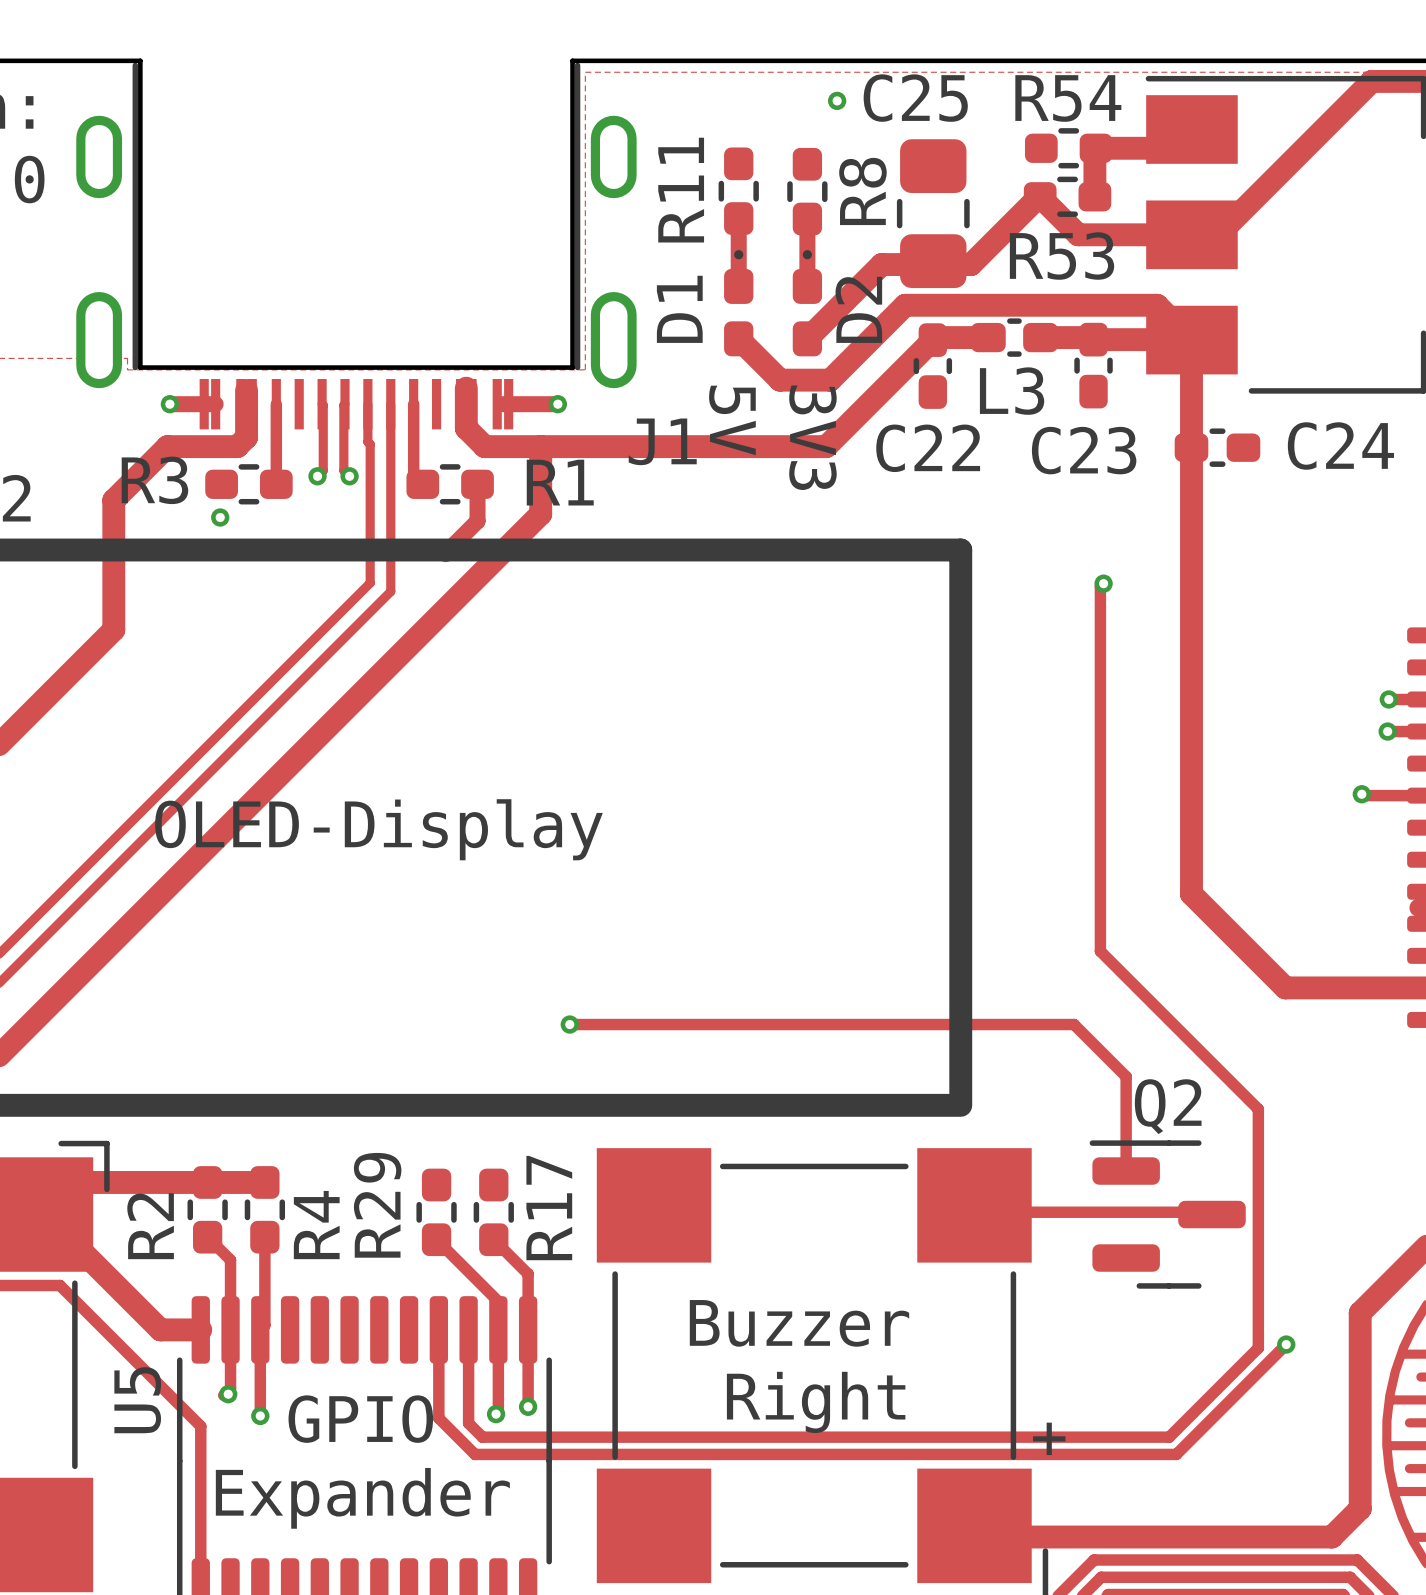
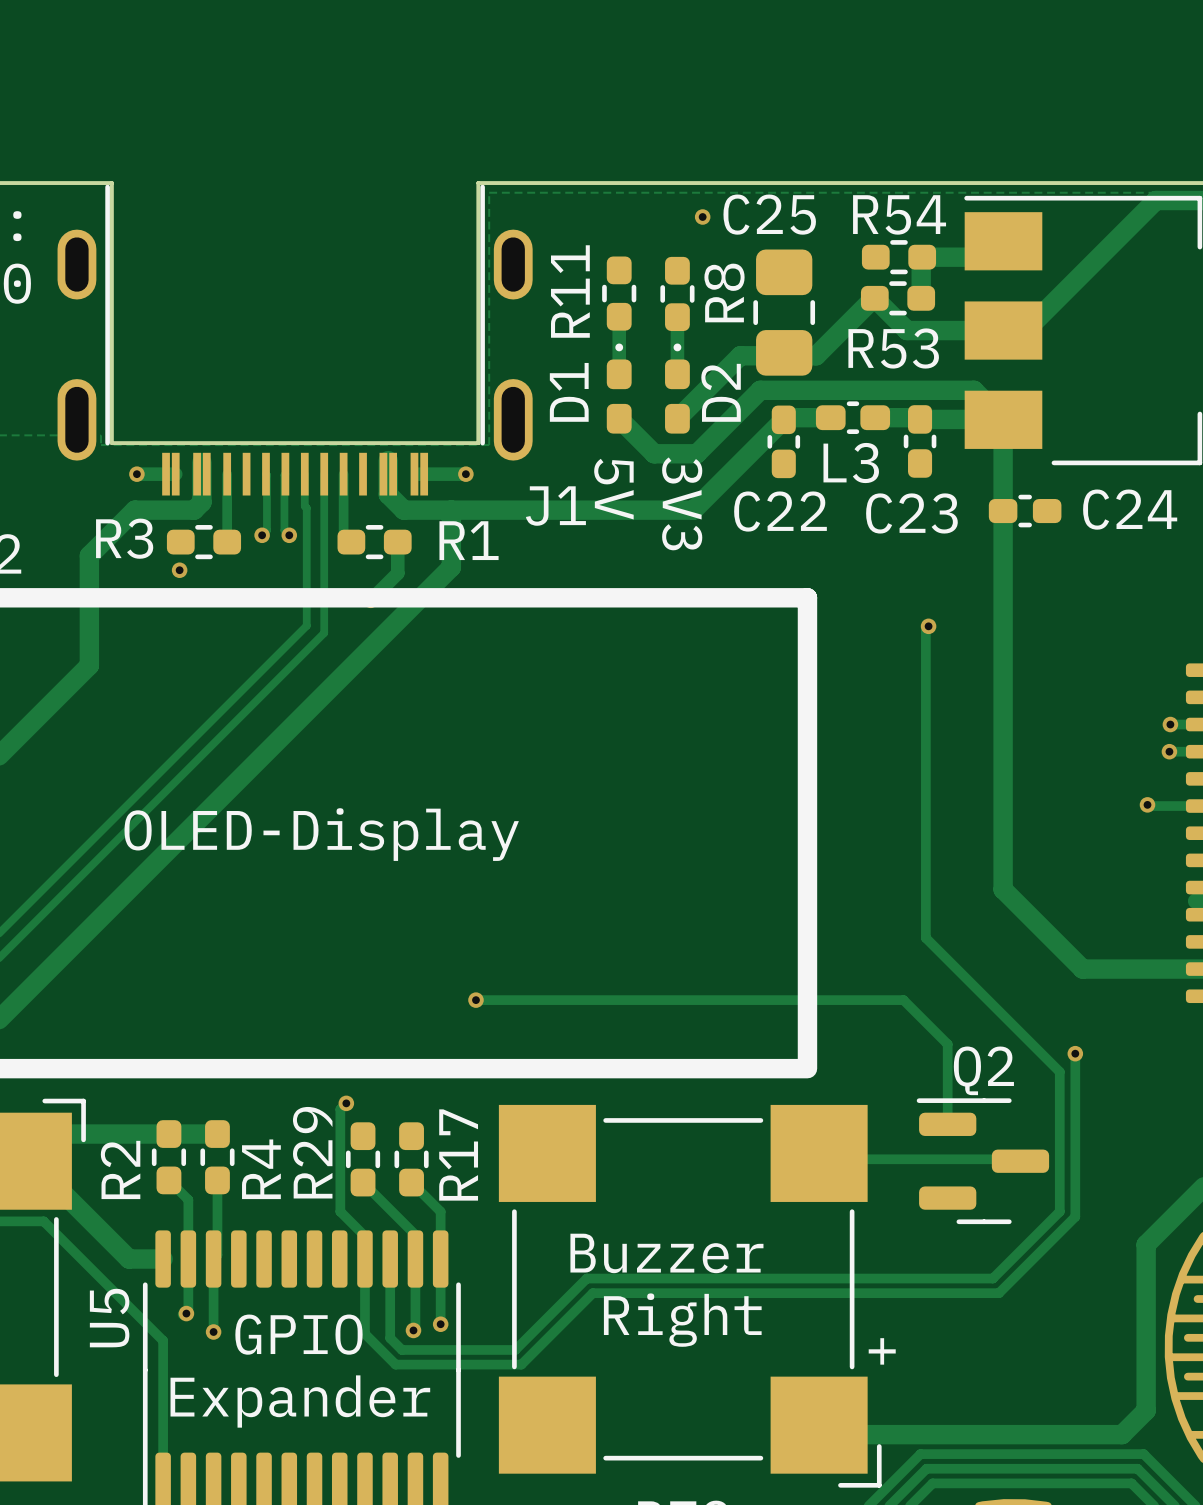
track: none -> (346, 1103) (340, 1109) (340, 1211) (364, 1236)
via: none -> (346, 1103)
track: (1258, 1274) (1258, 1348) (1169, 1437) (616, 1437) -> (1059, 1211) (992, 1278) (586, 1278) (515, 1349)
track: (1286, 1344) (1176, 1454) (623, 1454) -> (1075, 1053) (1075, 1216) (998, 1293) (592, 1293) (521, 1364)
via position: (1286, 1344) -> (1075, 1053)

